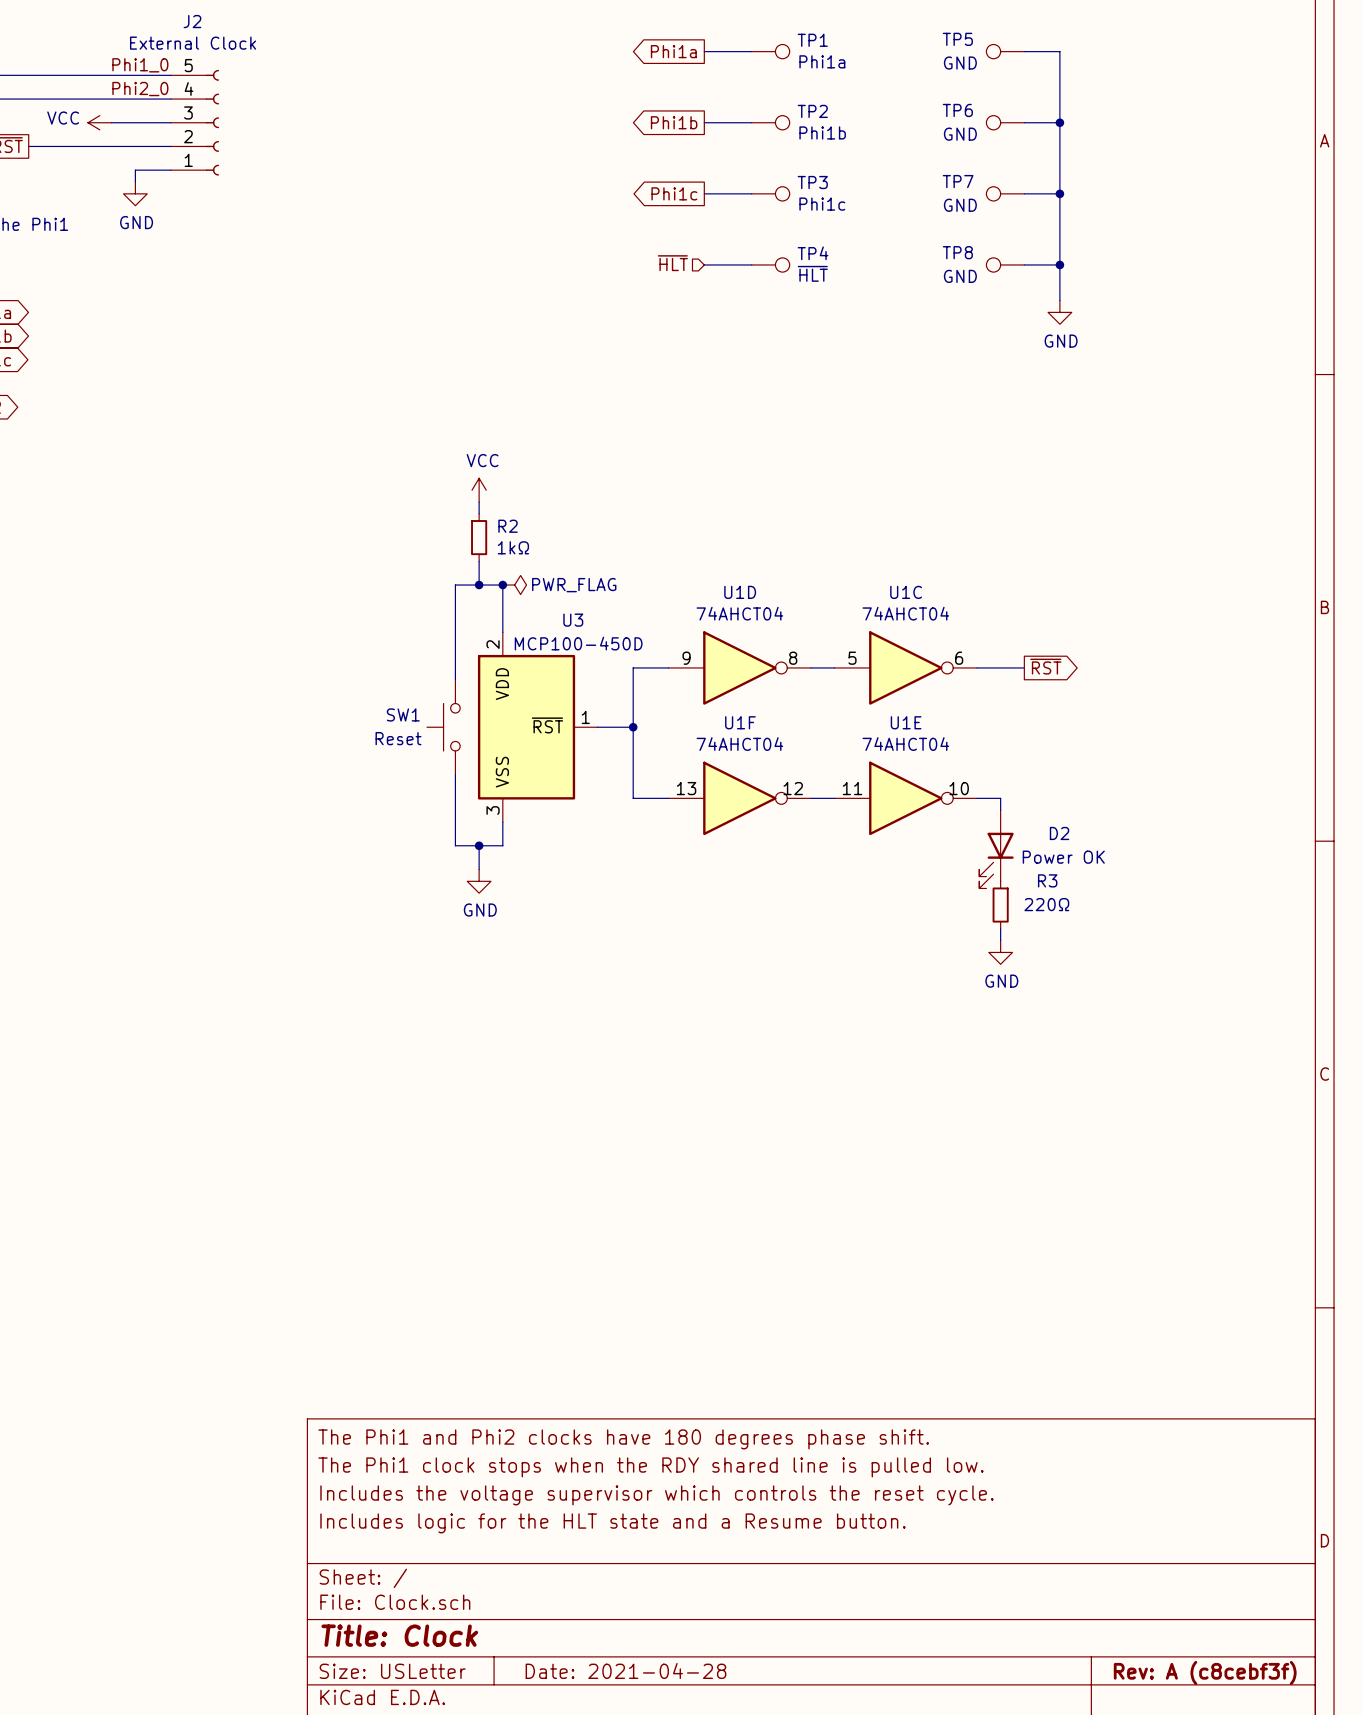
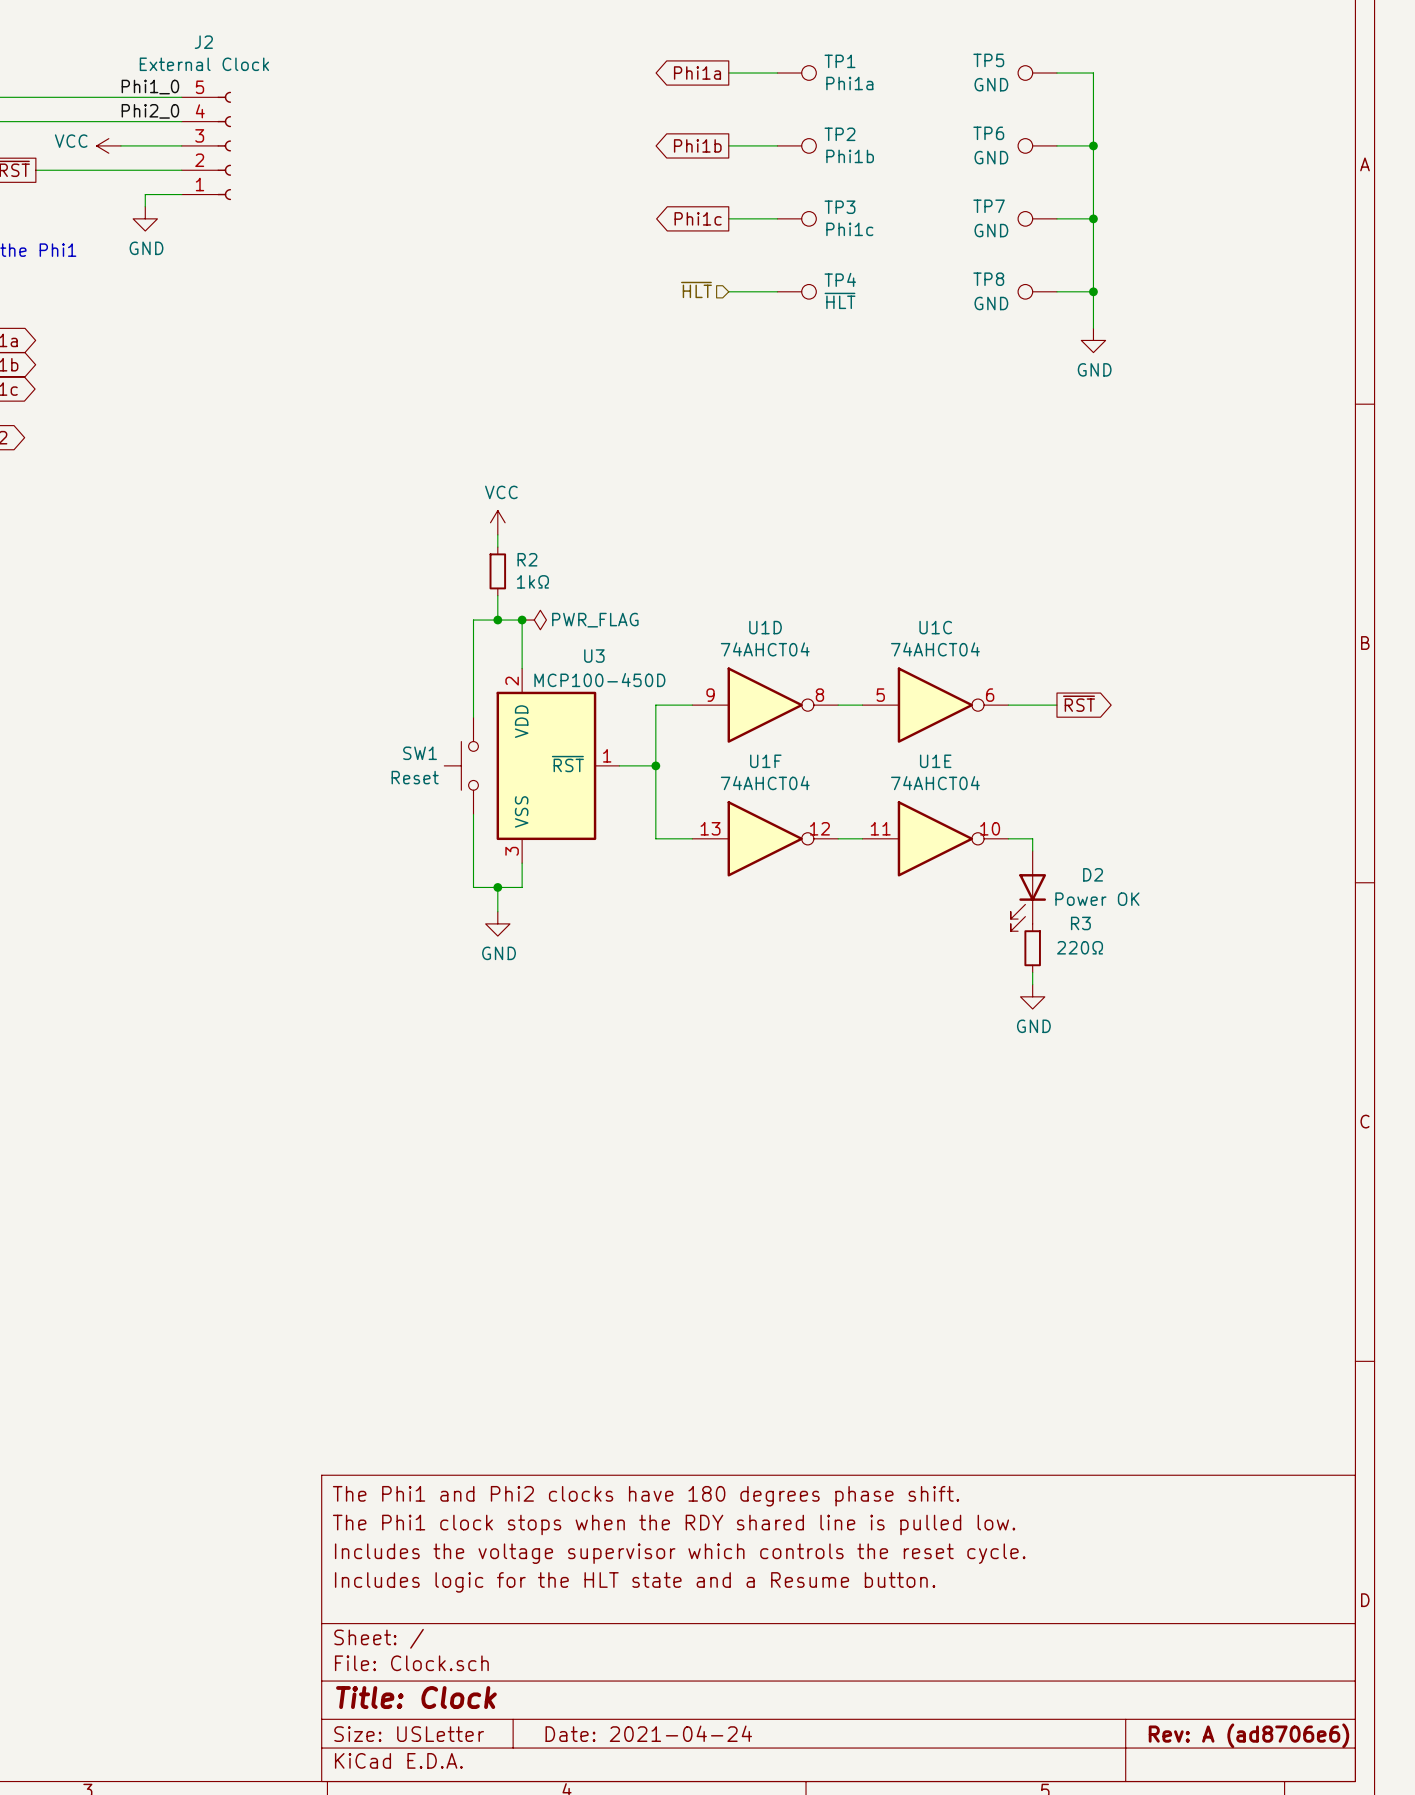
title block: Date: 2021-04-28 (625, 1670) -> Date: 2021-04-24 (648, 1733)
title block: Rev: A (c8cebf3f) (1205, 1672) -> Rev: A (ad8706e6) (1248, 1735)

